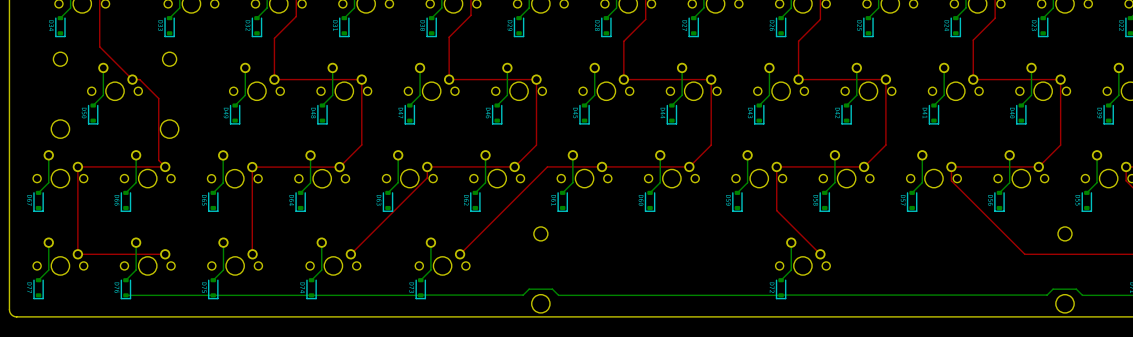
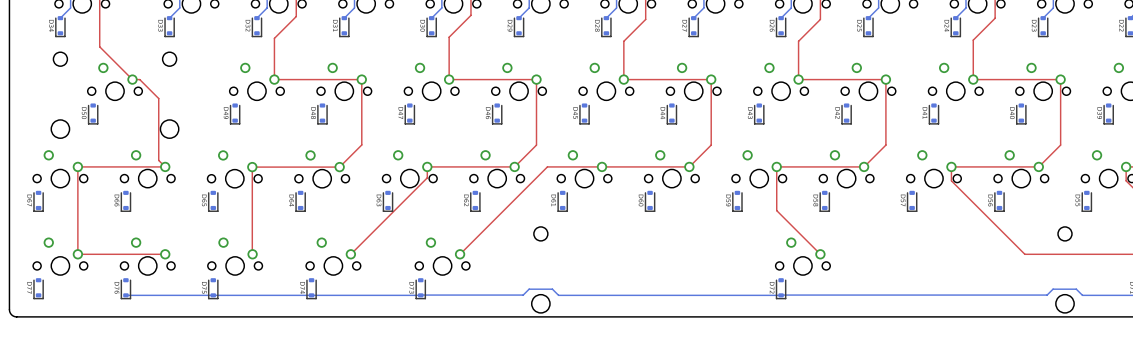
bottom track: (103, 67) (103, 95) (93, 105) -> none
bottom track: (245, 67) (245, 95) (235, 105) -> none
bottom track: (332, 67) (332, 95) (322, 105) -> none
bottom track: (420, 67) (420, 95) (409, 105) -> none
bottom track: (507, 67) (507, 95) (497, 105) -> none
bottom track: (594, 67) (594, 95) (584, 105) -> none
bottom track: (682, 67) (682, 95) (671, 105) -> none
bottom track: (769, 67) (769, 95) (759, 105) -> none
bottom track: (856, 67) (856, 95) (846, 105) -> none
bottom track: (944, 67) (944, 95) (933, 105) -> none
bottom track: (1031, 67) (1031, 95) (1021, 105) -> none
bottom track: (1118, 67) (1118, 95) (1108, 105) -> none
bottom track: (48, 155) (48, 182) (38, 192) -> none
bottom track: (136, 155) (136, 182) (125, 192) -> none
bottom track: (223, 155) (223, 182) (213, 192) -> none
bottom track: (310, 155) (310, 182) (300, 192) -> none
bottom track: (398, 155) (398, 182) (387, 192) -> none
bottom track: (485, 155) (485, 182) (475, 192) -> none
bottom track: (572, 155) (572, 182) (562, 192) -> none
bottom track: (660, 155) (660, 182) (650, 192) -> none
bottom track: (747, 155) (747, 182) (737, 192) -> none
bottom track: (834, 155) (834, 182) (824, 192) -> none
bottom track: (922, 155) (922, 182) (912, 192) -> none
bottom track: (1009, 155) (1009, 182) (999, 192) -> none
bottom track: (1097, 155) (1097, 182) (1086, 192) -> none
bottom track: (48, 242) (48, 270) (38, 280) -> none
bottom track: (136, 242) (136, 270) (125, 280) -> none
bottom track: (223, 242) (223, 270) (213, 280) -> none
bottom track: (321, 242) (321, 270) (311, 280) -> none
bottom track: (430, 242) (430, 270) (420, 280) -> none
bottom track: (791, 242) (791, 270) (781, 280) -> none

